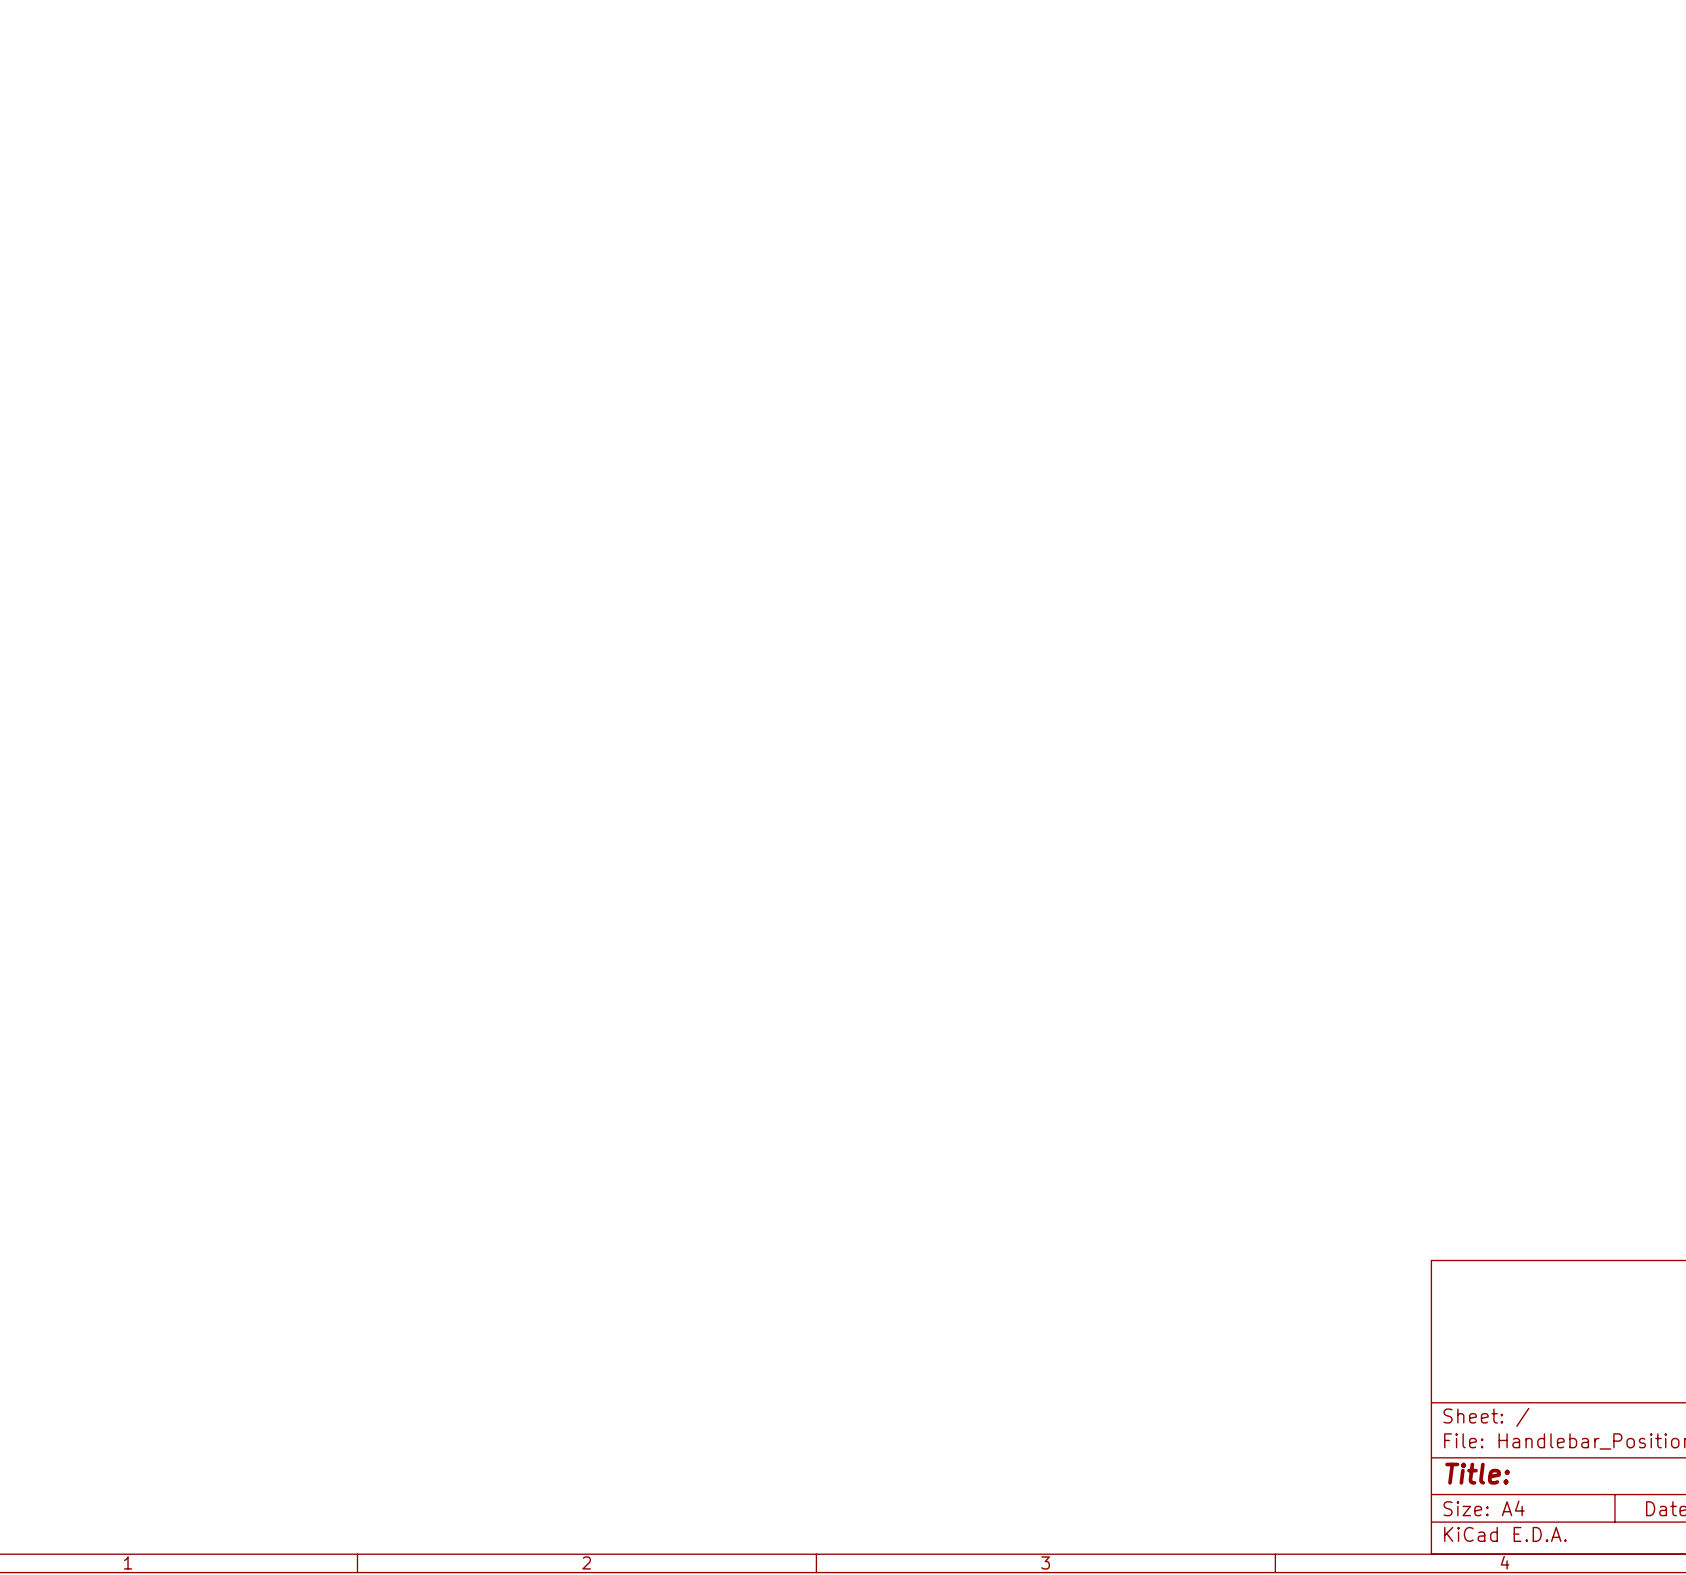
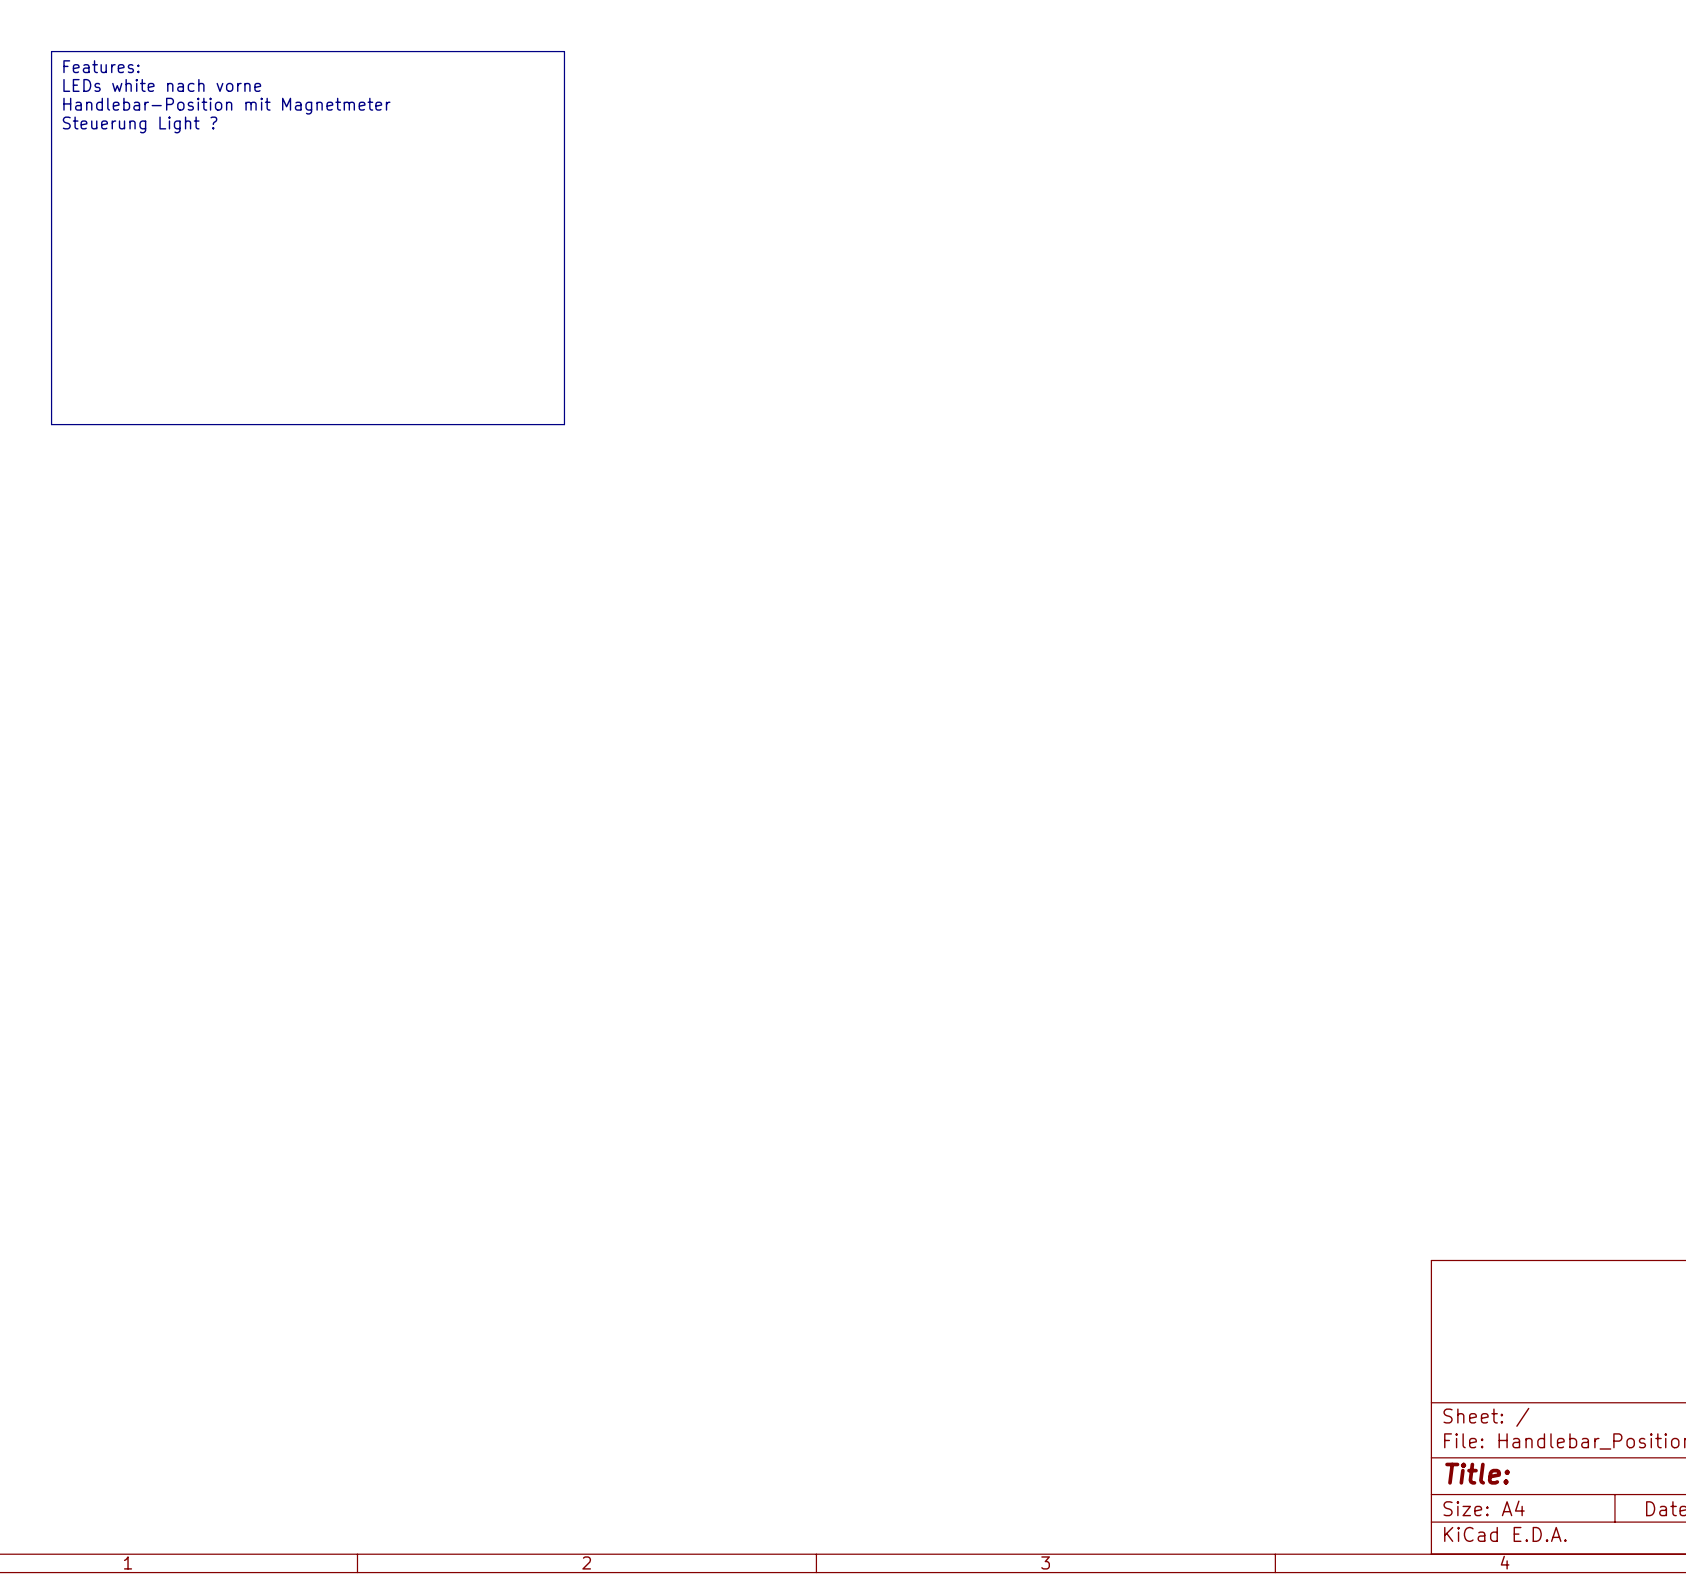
line: none -> (51, 51) (564, 51) (564, 424) (51, 424) (51, 51)
text: none -> Features: (101, 66)
text: none -> LEDs white nach vorne (162, 85)
text: none -> Handlebar-Position mit Magnetmeter (226, 106)
text: none -> Steuerung Light ? (140, 124)

